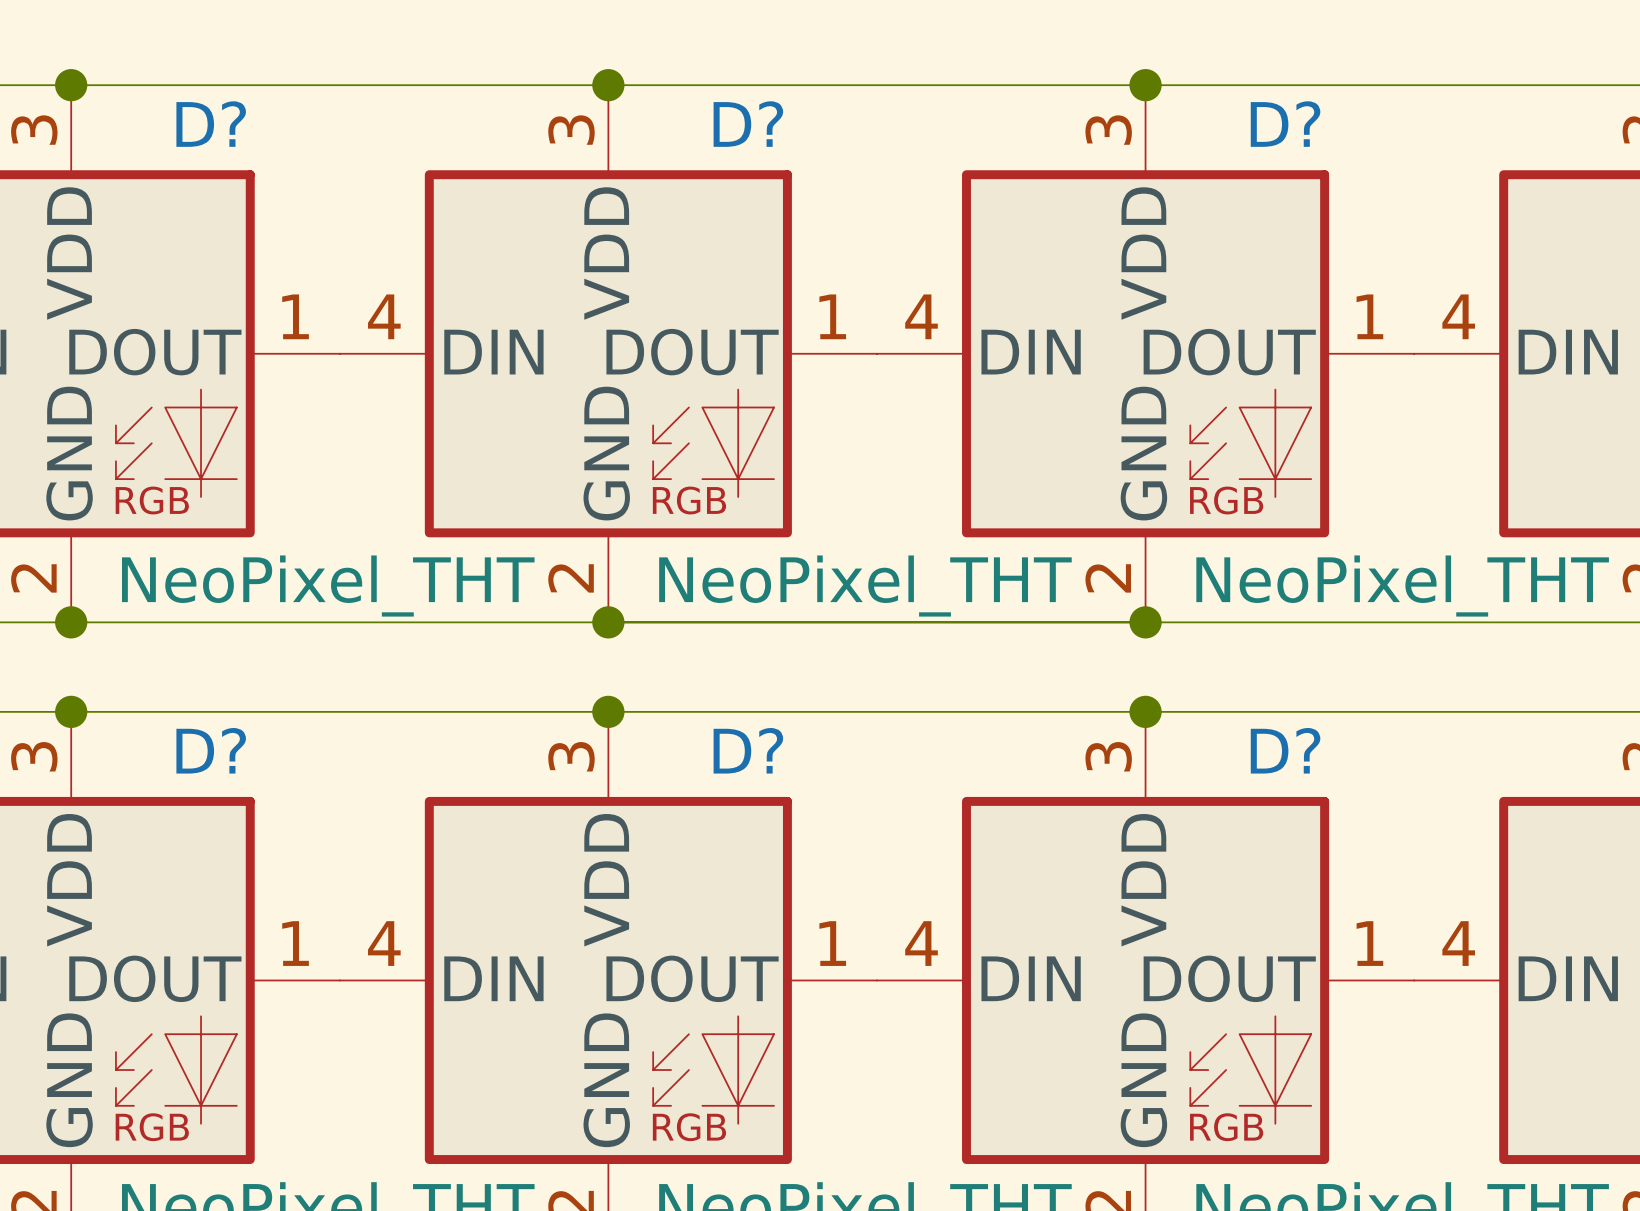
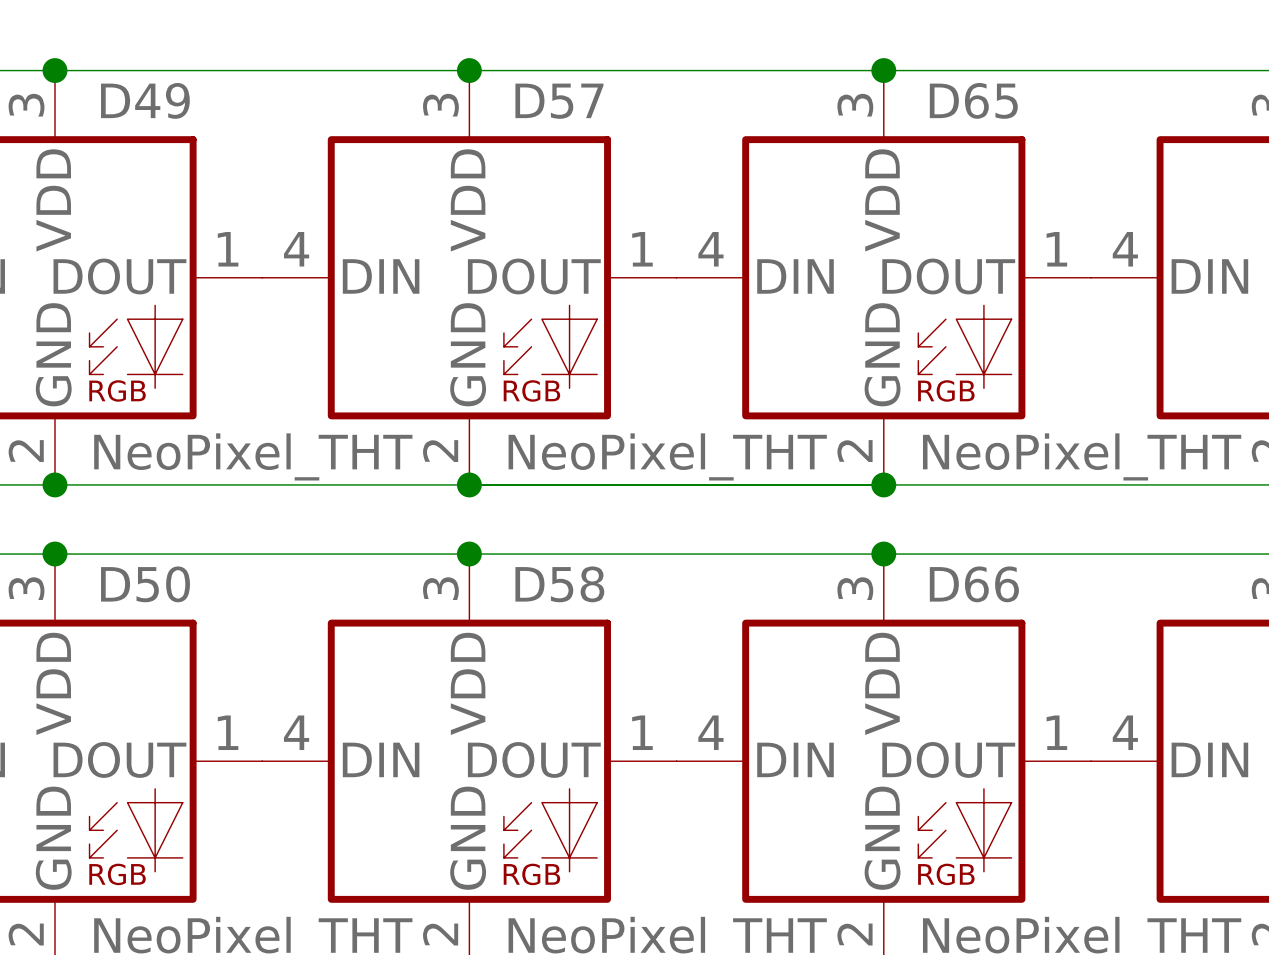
D? name: D? (211, 124) -> D49 (145, 100)
D? name: D? (748, 124) -> D57 (559, 101)
D? name: D? (1285, 124) -> D65 (973, 100)
D? name: D? (211, 750) -> D50 (145, 584)
D? name: D? (748, 750) -> D58 (559, 584)
D? name: D? (1285, 750) -> D66 (974, 584)

